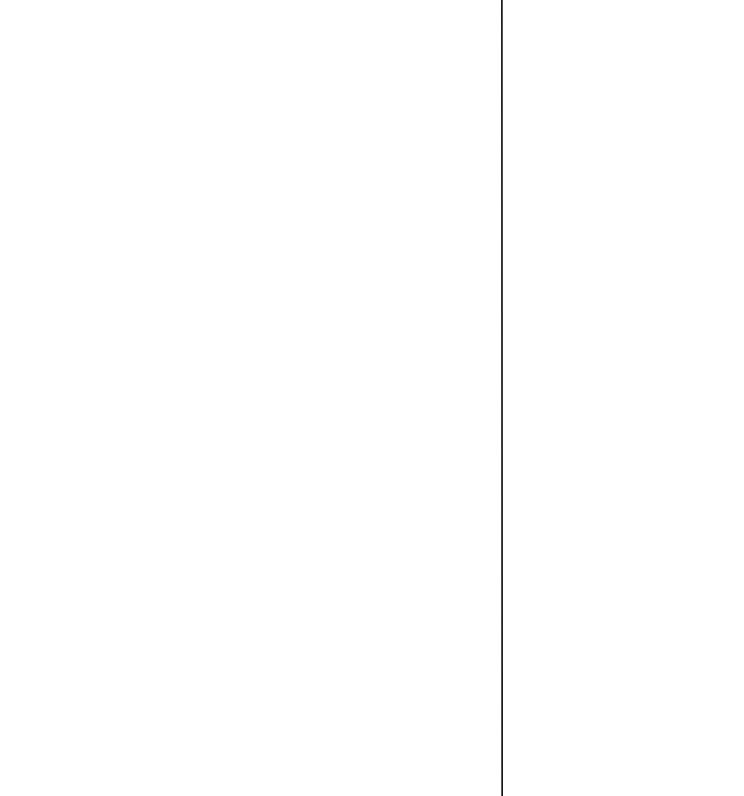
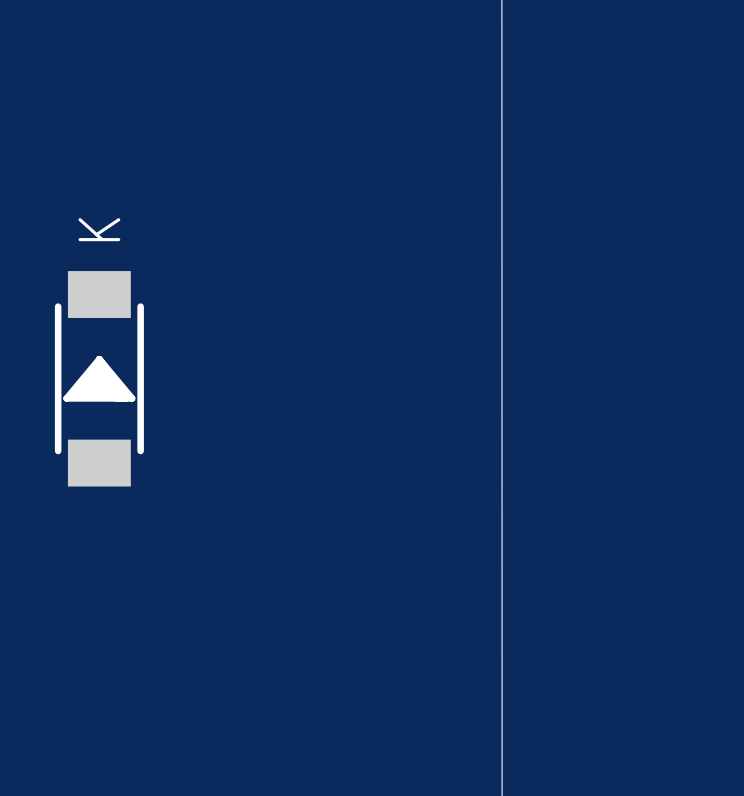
part: none -> (99, 378)

